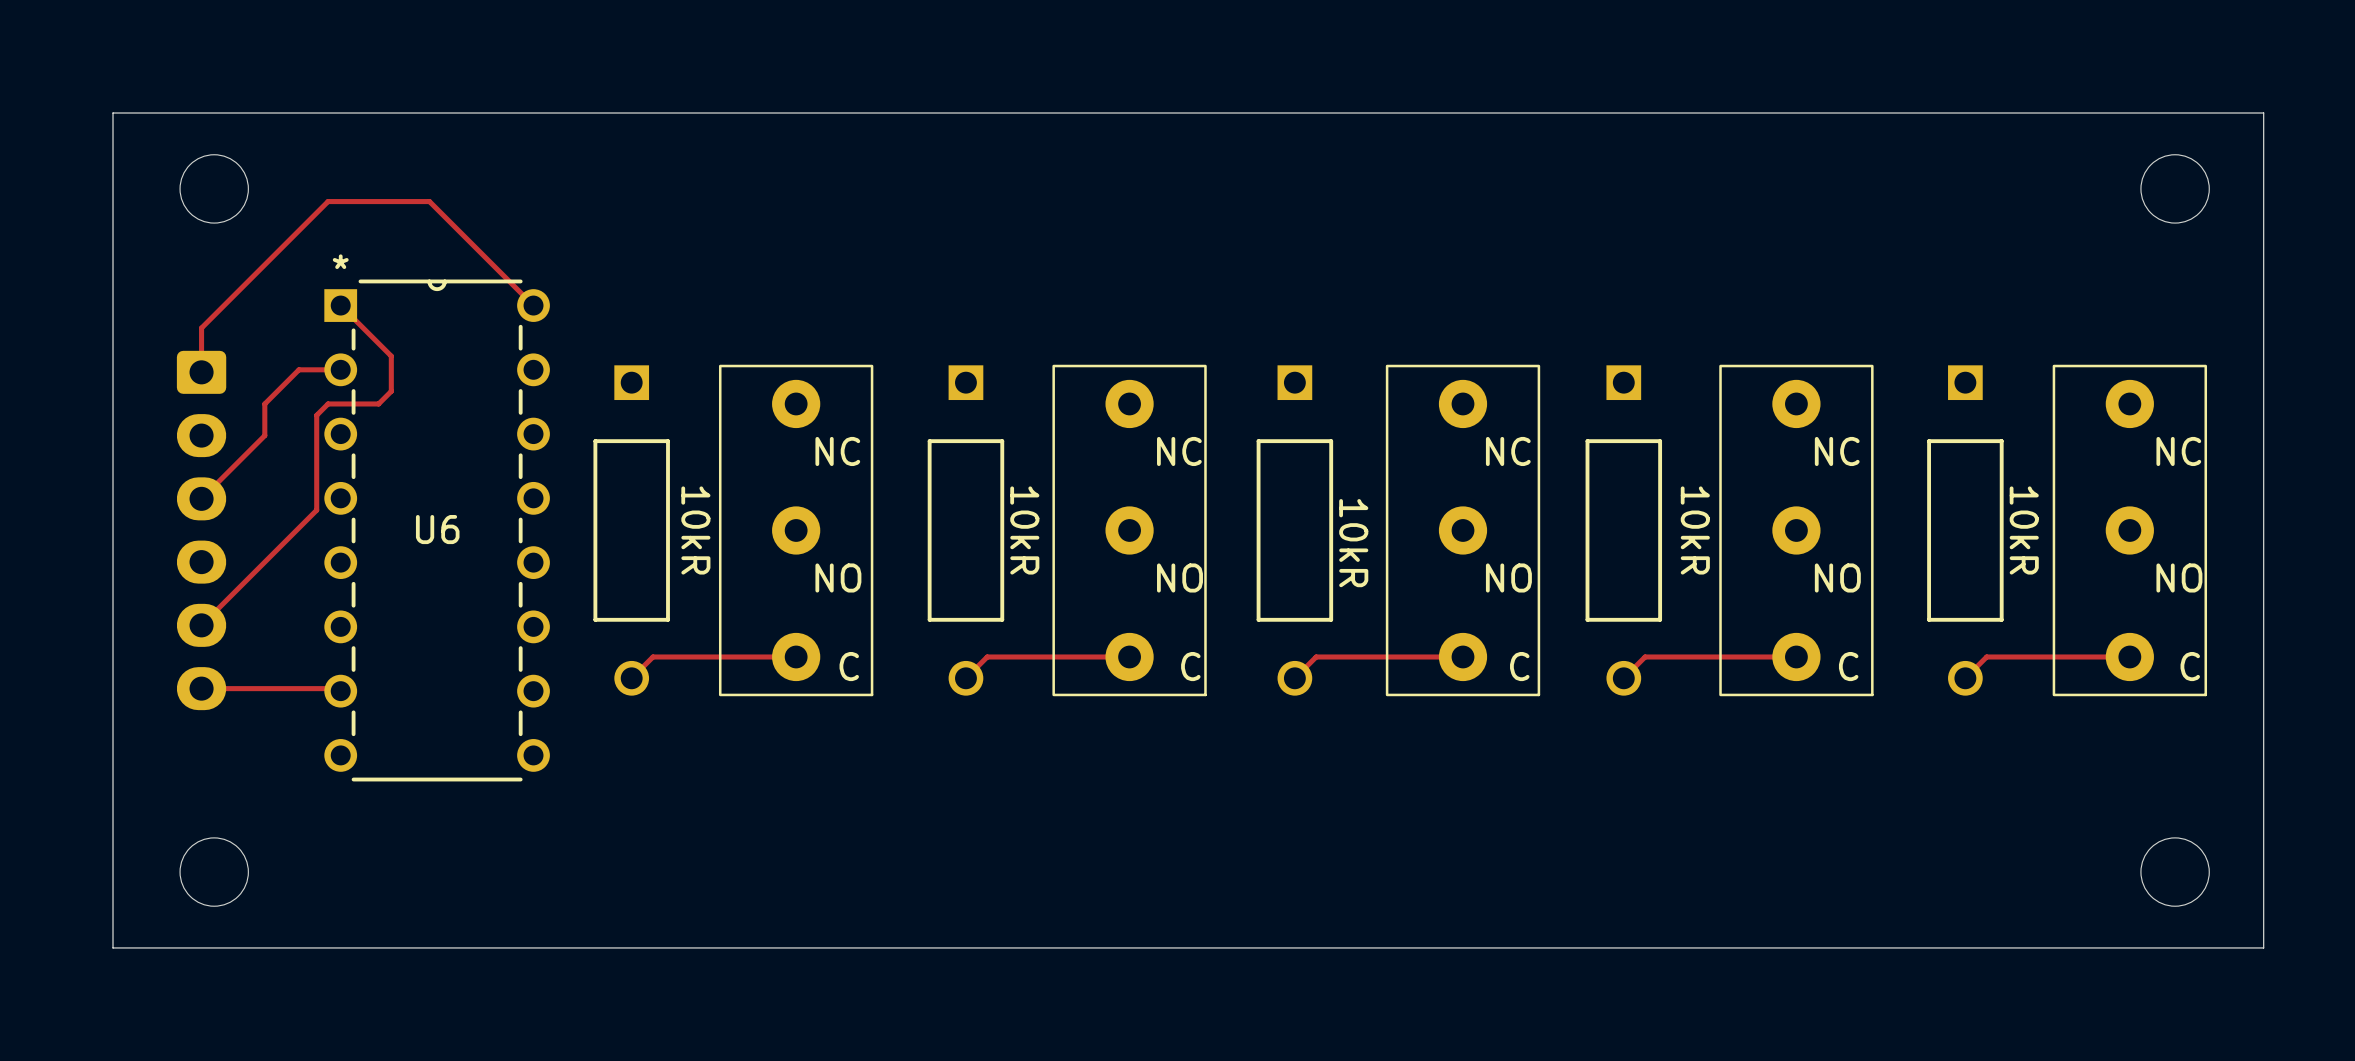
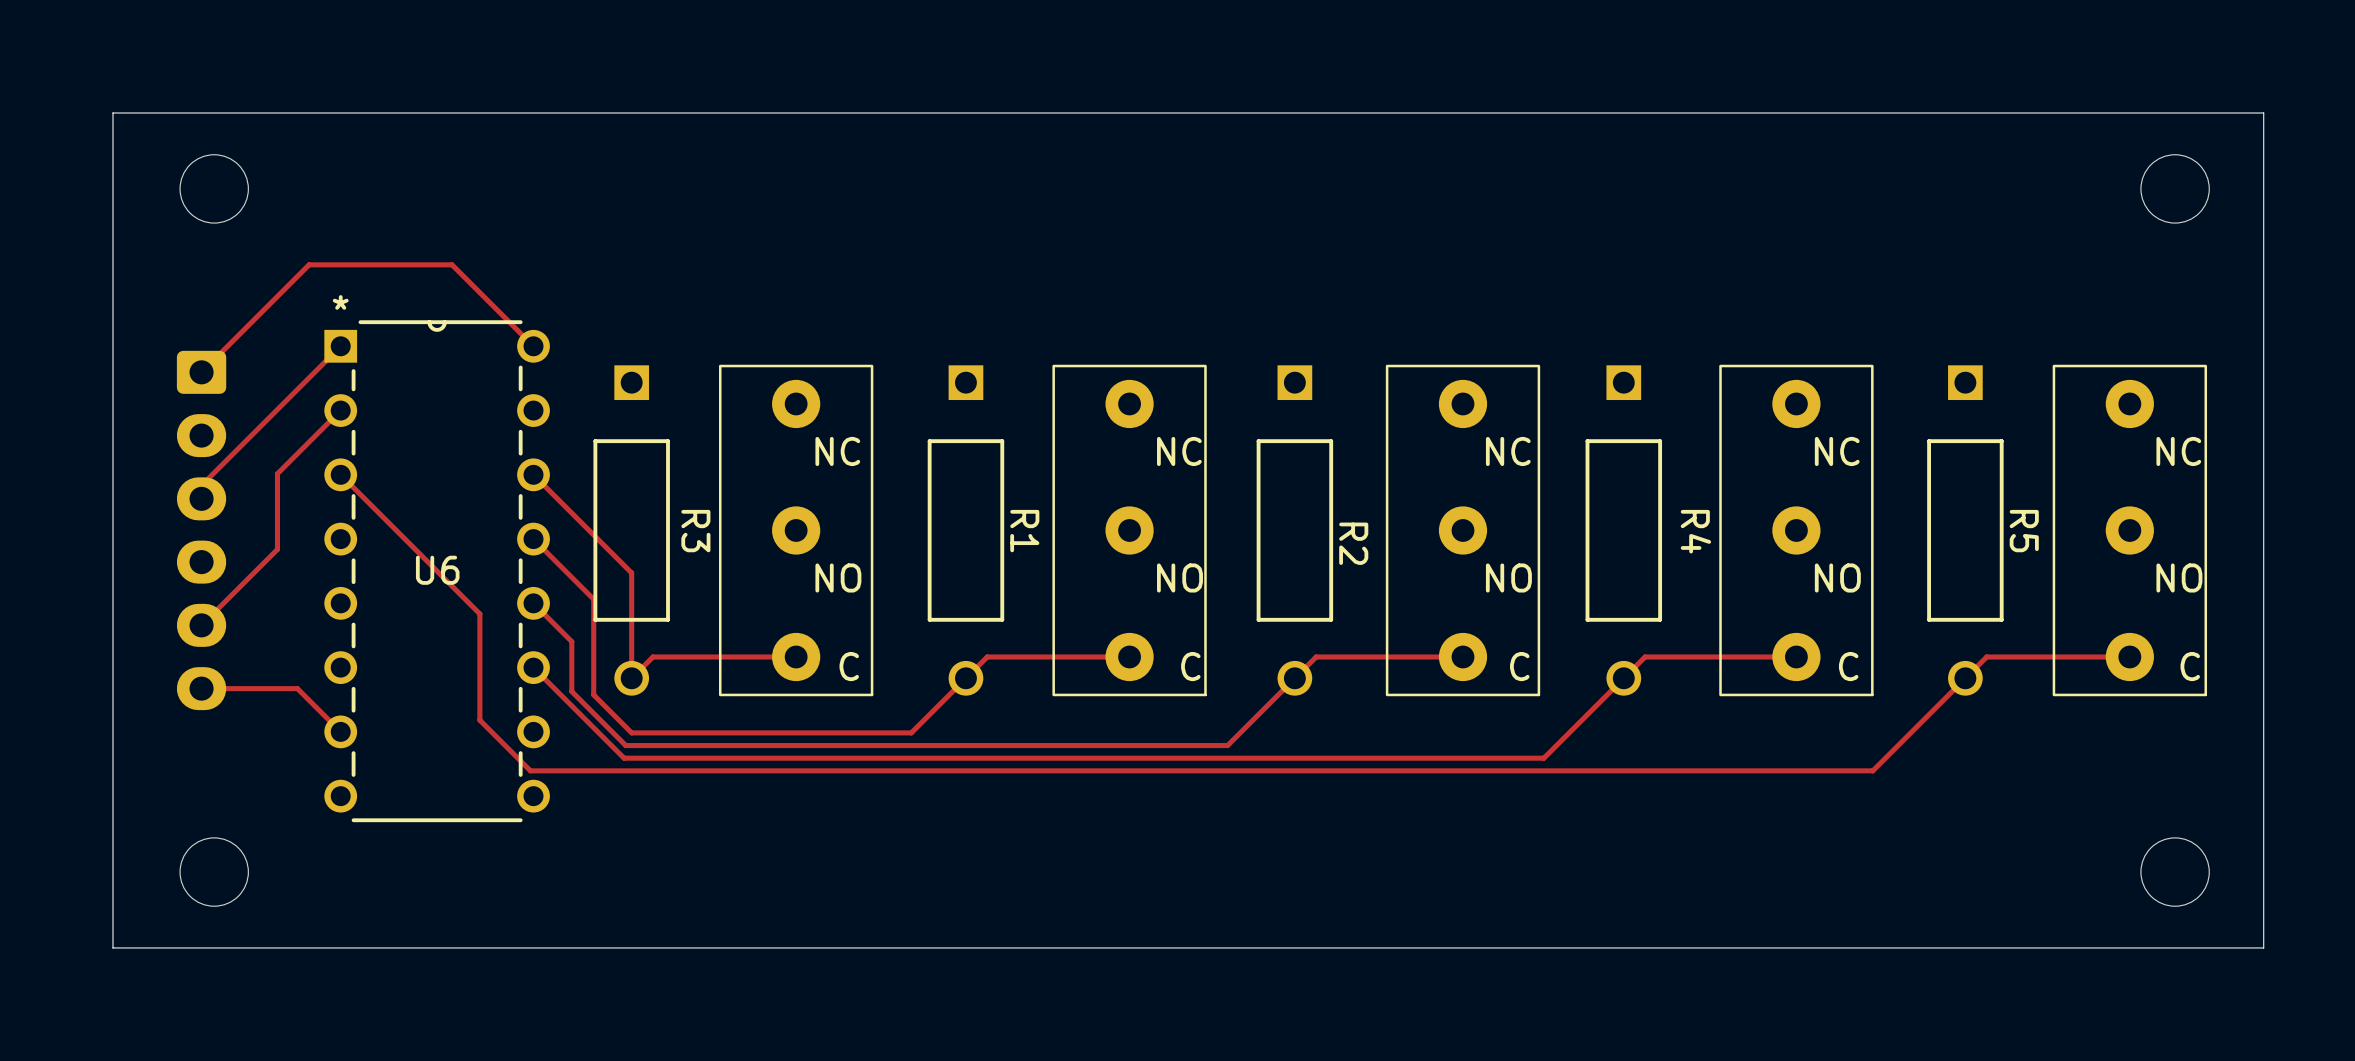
track: (340, 305) (391, 356) (391, 391) (378, 403) (328, 403) (316, 415) (316, 510) (277, 549) -> (340, 410) (277, 473) (277, 549)
track: (533, 305) (429, 201) (328, 201) (201, 328) (201, 372) -> (533, 346) (452, 264) (309, 264) (201, 372)
track: none -> (340, 346) (201, 485) (201, 498)
track: (340, 369) (298, 369) (264, 403) (264, 435) (201, 498) (211, 498) -> none
track: none -> (340, 474) (479, 613) (479, 720) (530, 770) (1872, 770) (1965, 678)
track: none -> (533, 474) (631, 572) (631, 678)
U6 position: (437, 530) -> (437, 571)
10kR name: 10kR (695, 530) -> R3 (695, 531)
10kR name: 10kR (1024, 530) -> R1 (1024, 531)
10kR name: 10kR (1695, 530) -> R4 (1695, 531)
10kR name: 10kR (2024, 530) -> R5 (2024, 531)
track: none -> (533, 539) (593, 599) (593, 694) (631, 732) (911, 732) (965, 678)
10kR name: 10kR (1353, 543) -> R2 (1353, 543)
track: none -> (533, 615) (533, 603) (571, 641) (571, 691) (625, 745) (1227, 745) (1294, 678)
track: none -> (533, 667) (624, 758) (1543, 758) (1623, 678)
track: (297, 688) (338, 688) (340, 691) -> (297, 688) (340, 731)

